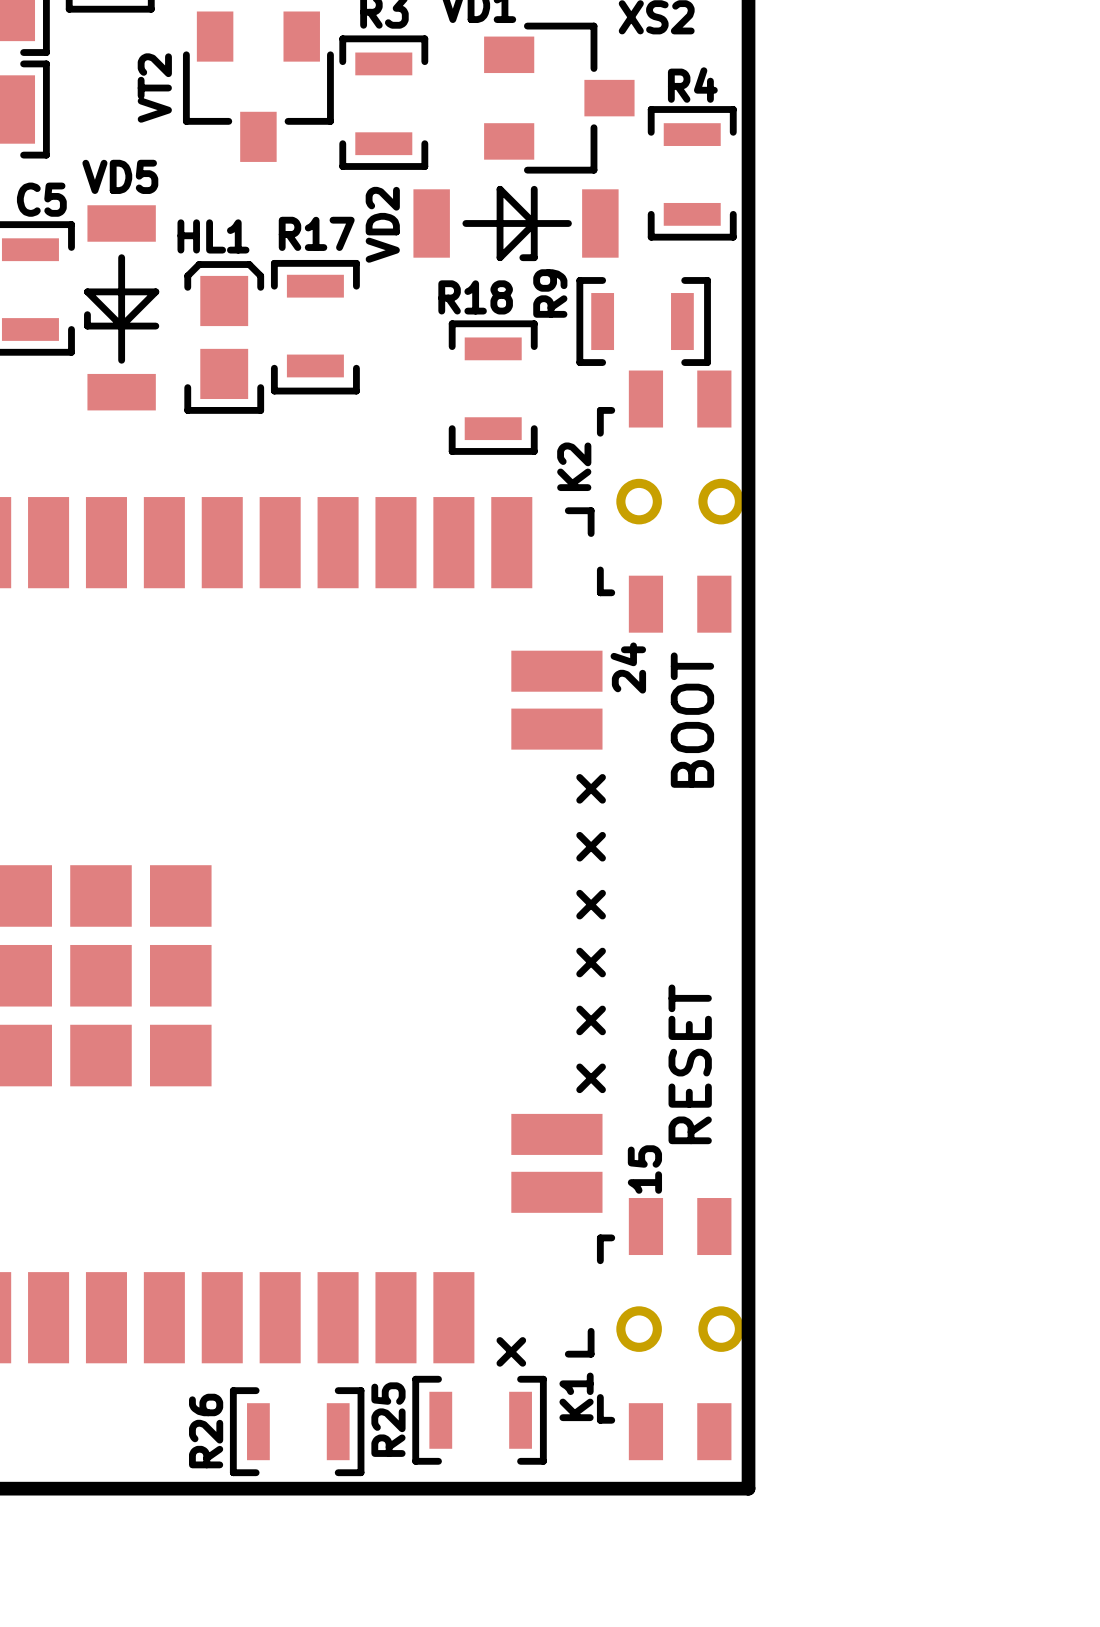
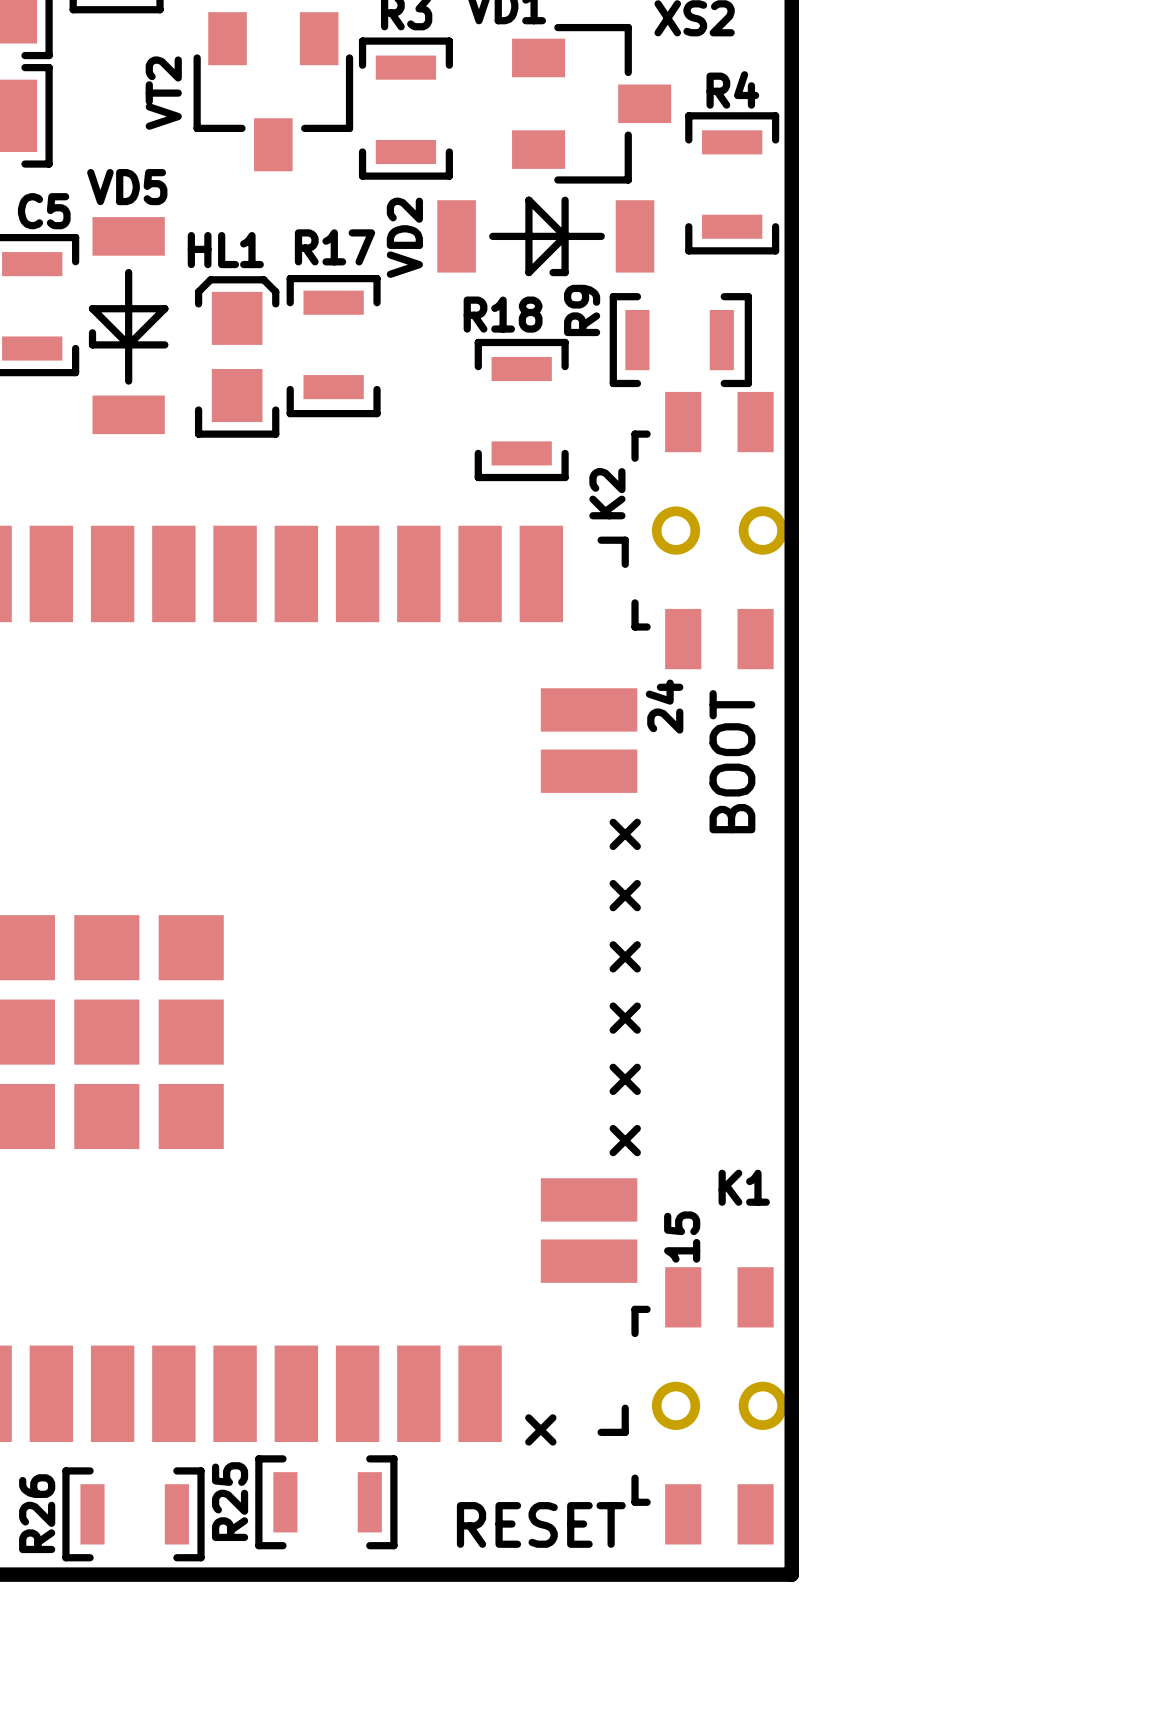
text rotation: 0° (690, 1064) -> 90° clockwise (541, 1524)
text position: RESET (690, 1064) -> RESET (541, 1524)
K1 name rotation: 0° (576, 1396) -> 90° clockwise (744, 1187)
K1 name position: K1 (576, 1396) -> K1 (744, 1187)
R25 position: (479, 1420) -> (326, 1502)
R26 position: (297, 1431) -> (133, 1514)

